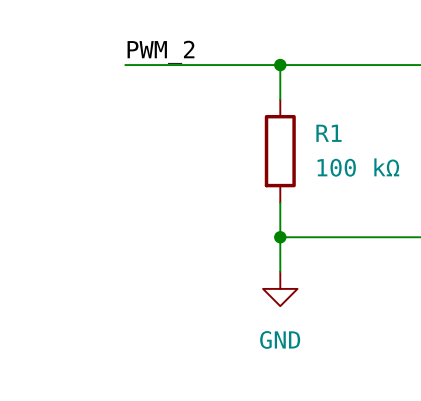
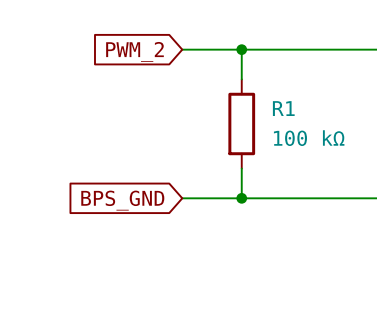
label: PWM_2 (160, 52) -> none
wire: (125, 65) (211, 65) -> none
global label: none -> PWM_2 (134, 51)
wire: (280, 237) (280, 271) -> (241, 198) (182, 198)
global label: none -> BPS_GND (122, 200)
power symbol: GND (280, 288) -> none

